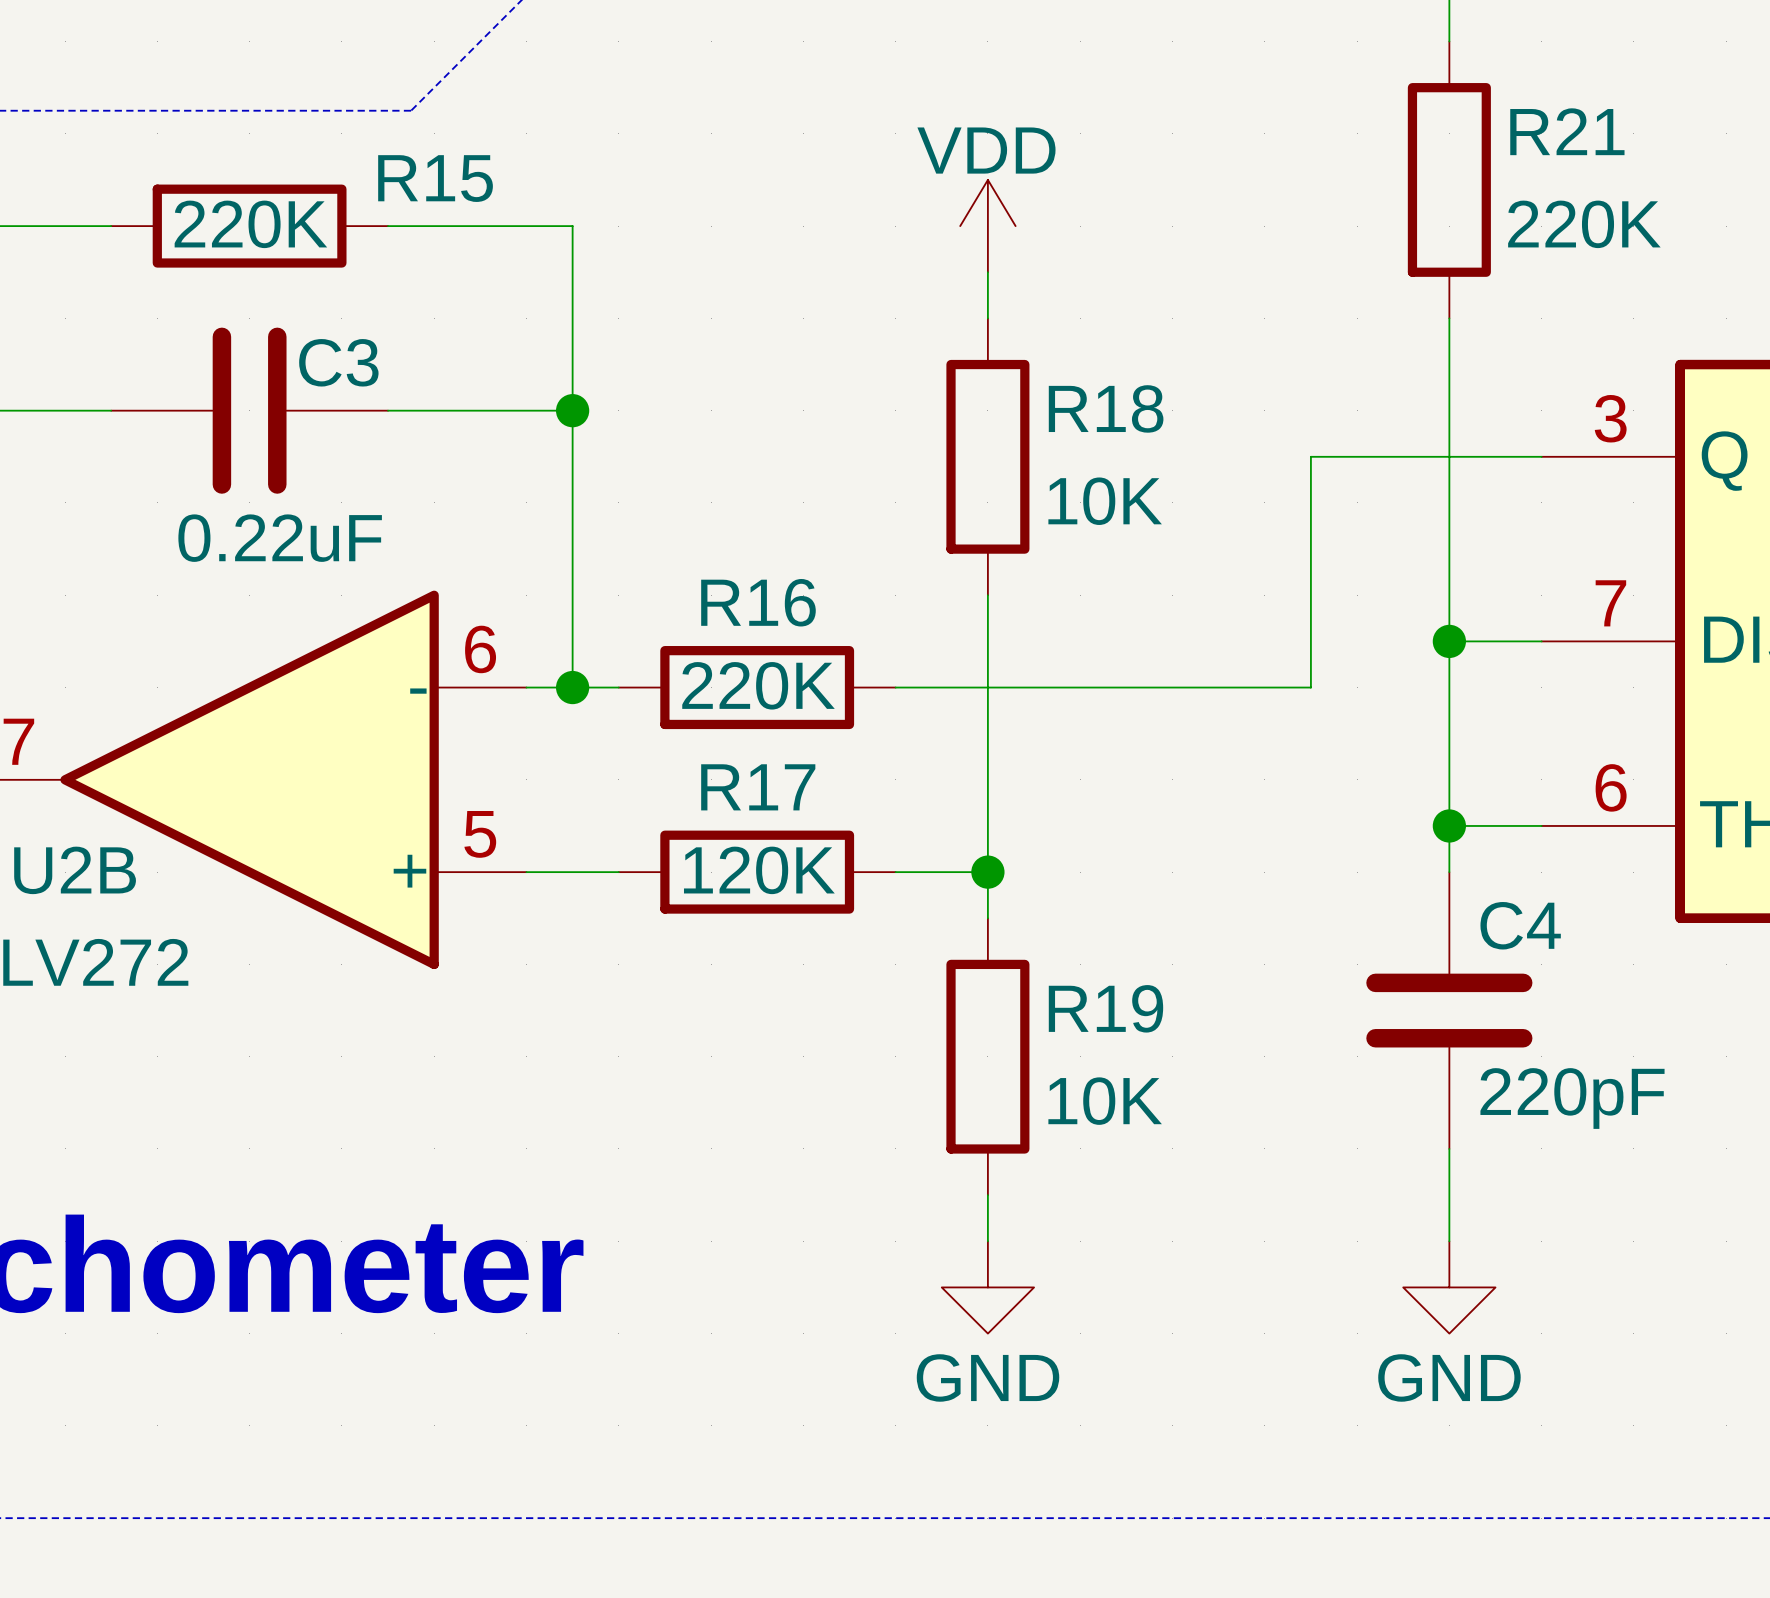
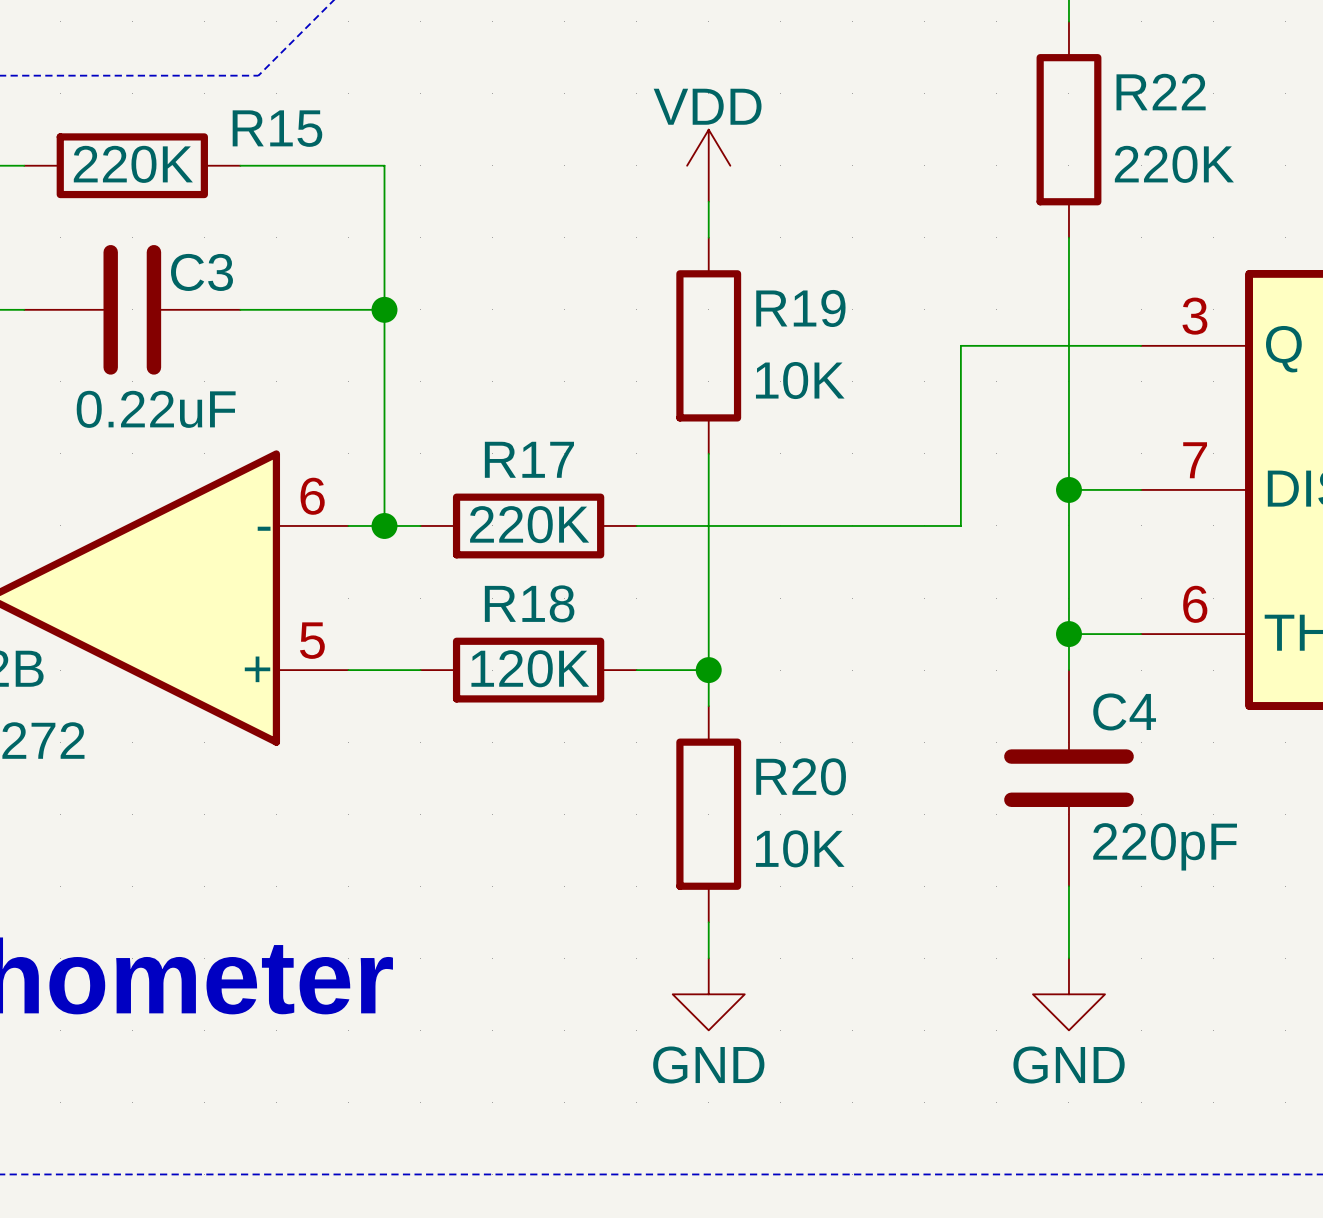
R21 name: R21 (1567, 131) -> R22 (1161, 92)
R18 name: R18 (1106, 408) -> R19 (800, 308)
R16 name: R16 (758, 602) -> R17 (529, 459)
R17 name: R17 (758, 787) -> R18 (529, 603)
R19 name: R19 (1105, 1008) -> R20 (801, 776)

